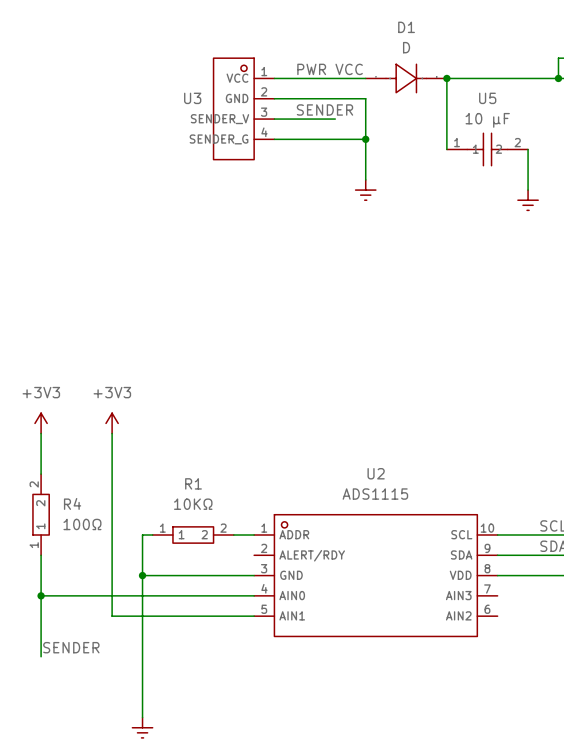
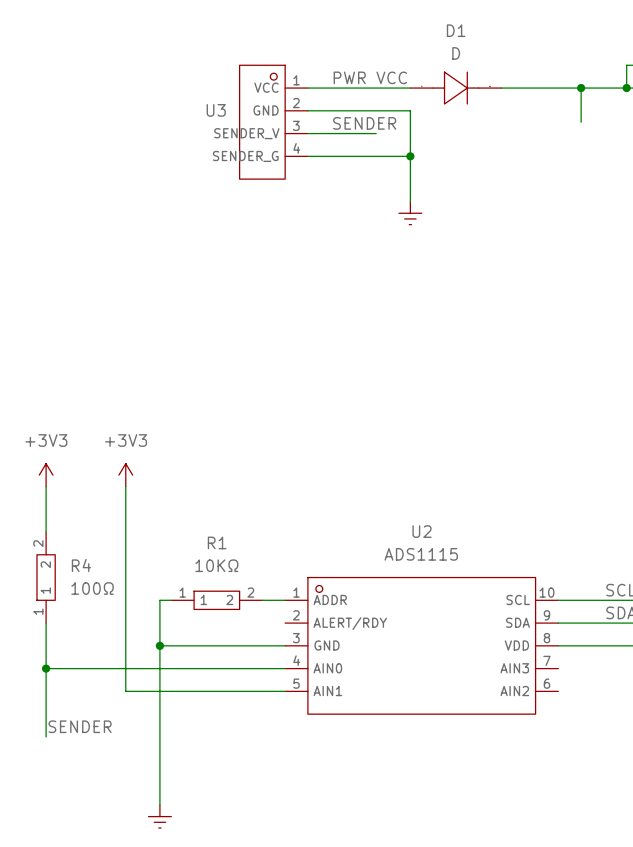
wire: (446, 78) (446, 149) -> none
junction: (446, 78) -> none
wire: none -> (581, 88) (581, 122)
junction: none -> (581, 88)
U5: 10 µF (487, 149) -> none
wire: (528, 149) (528, 190) -> none
power symbol: (528, 200) -> none

